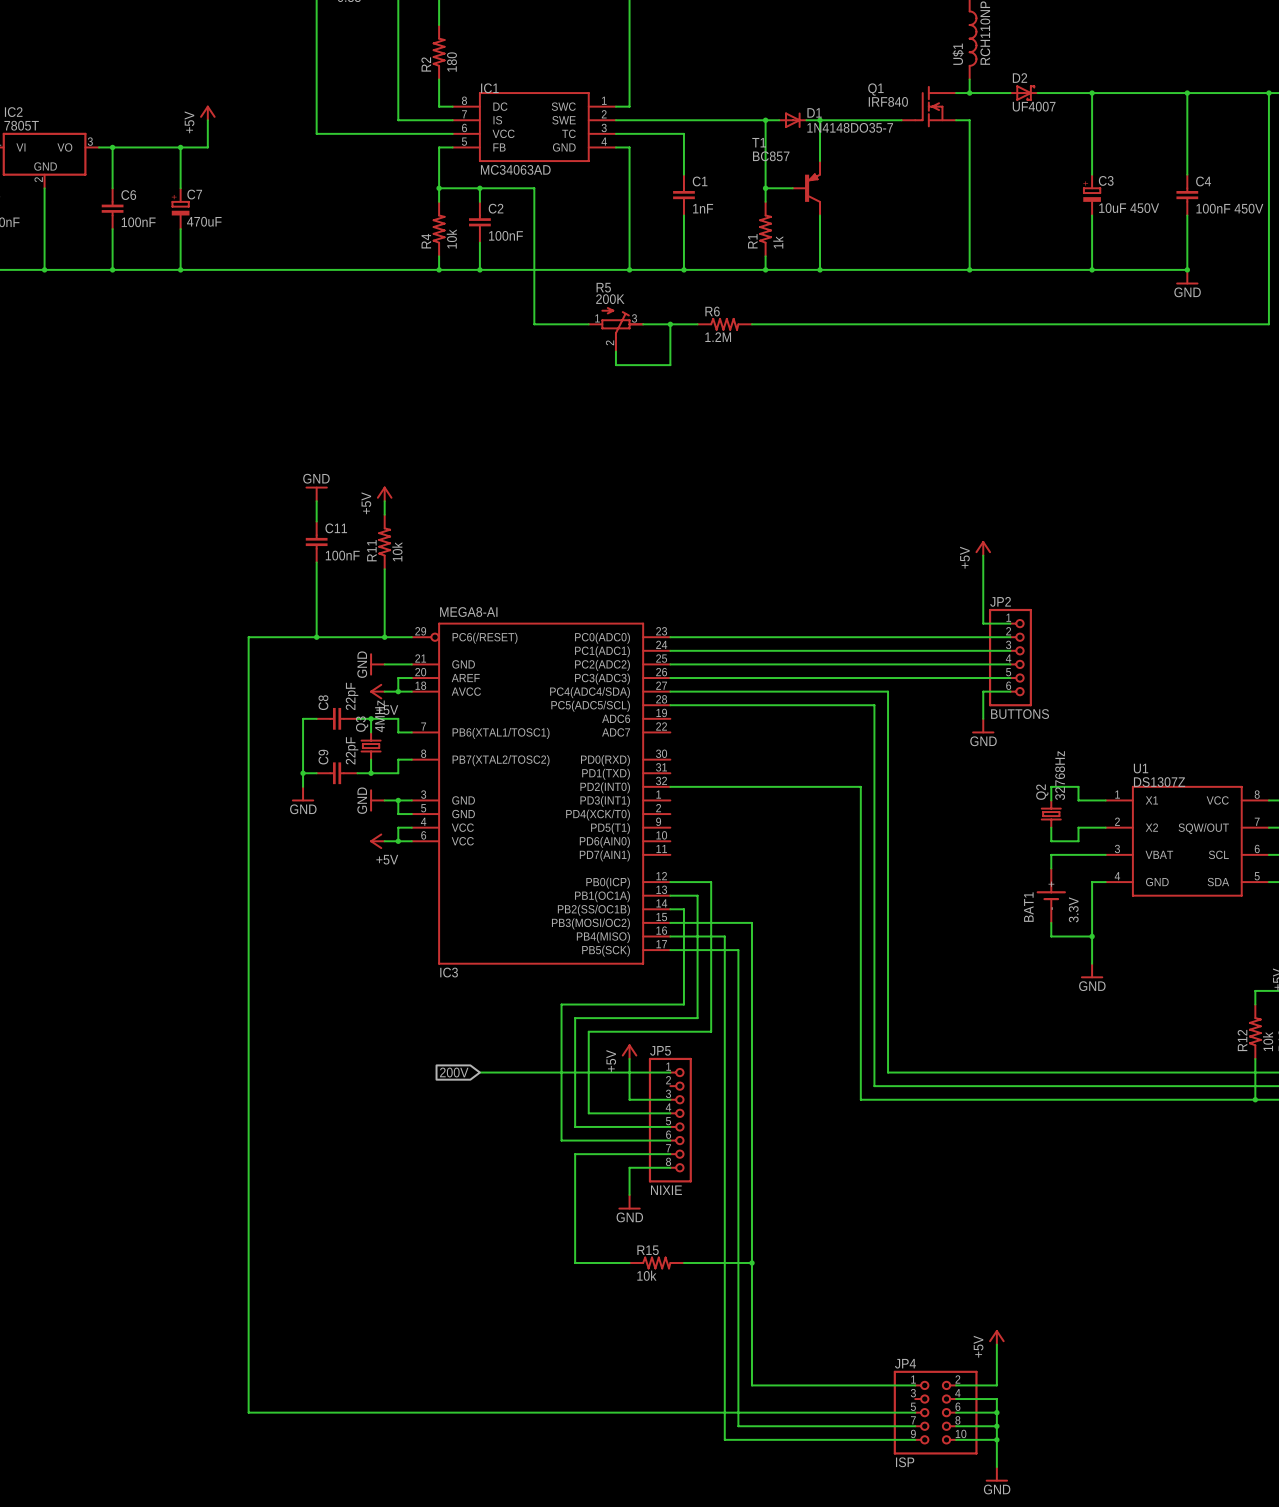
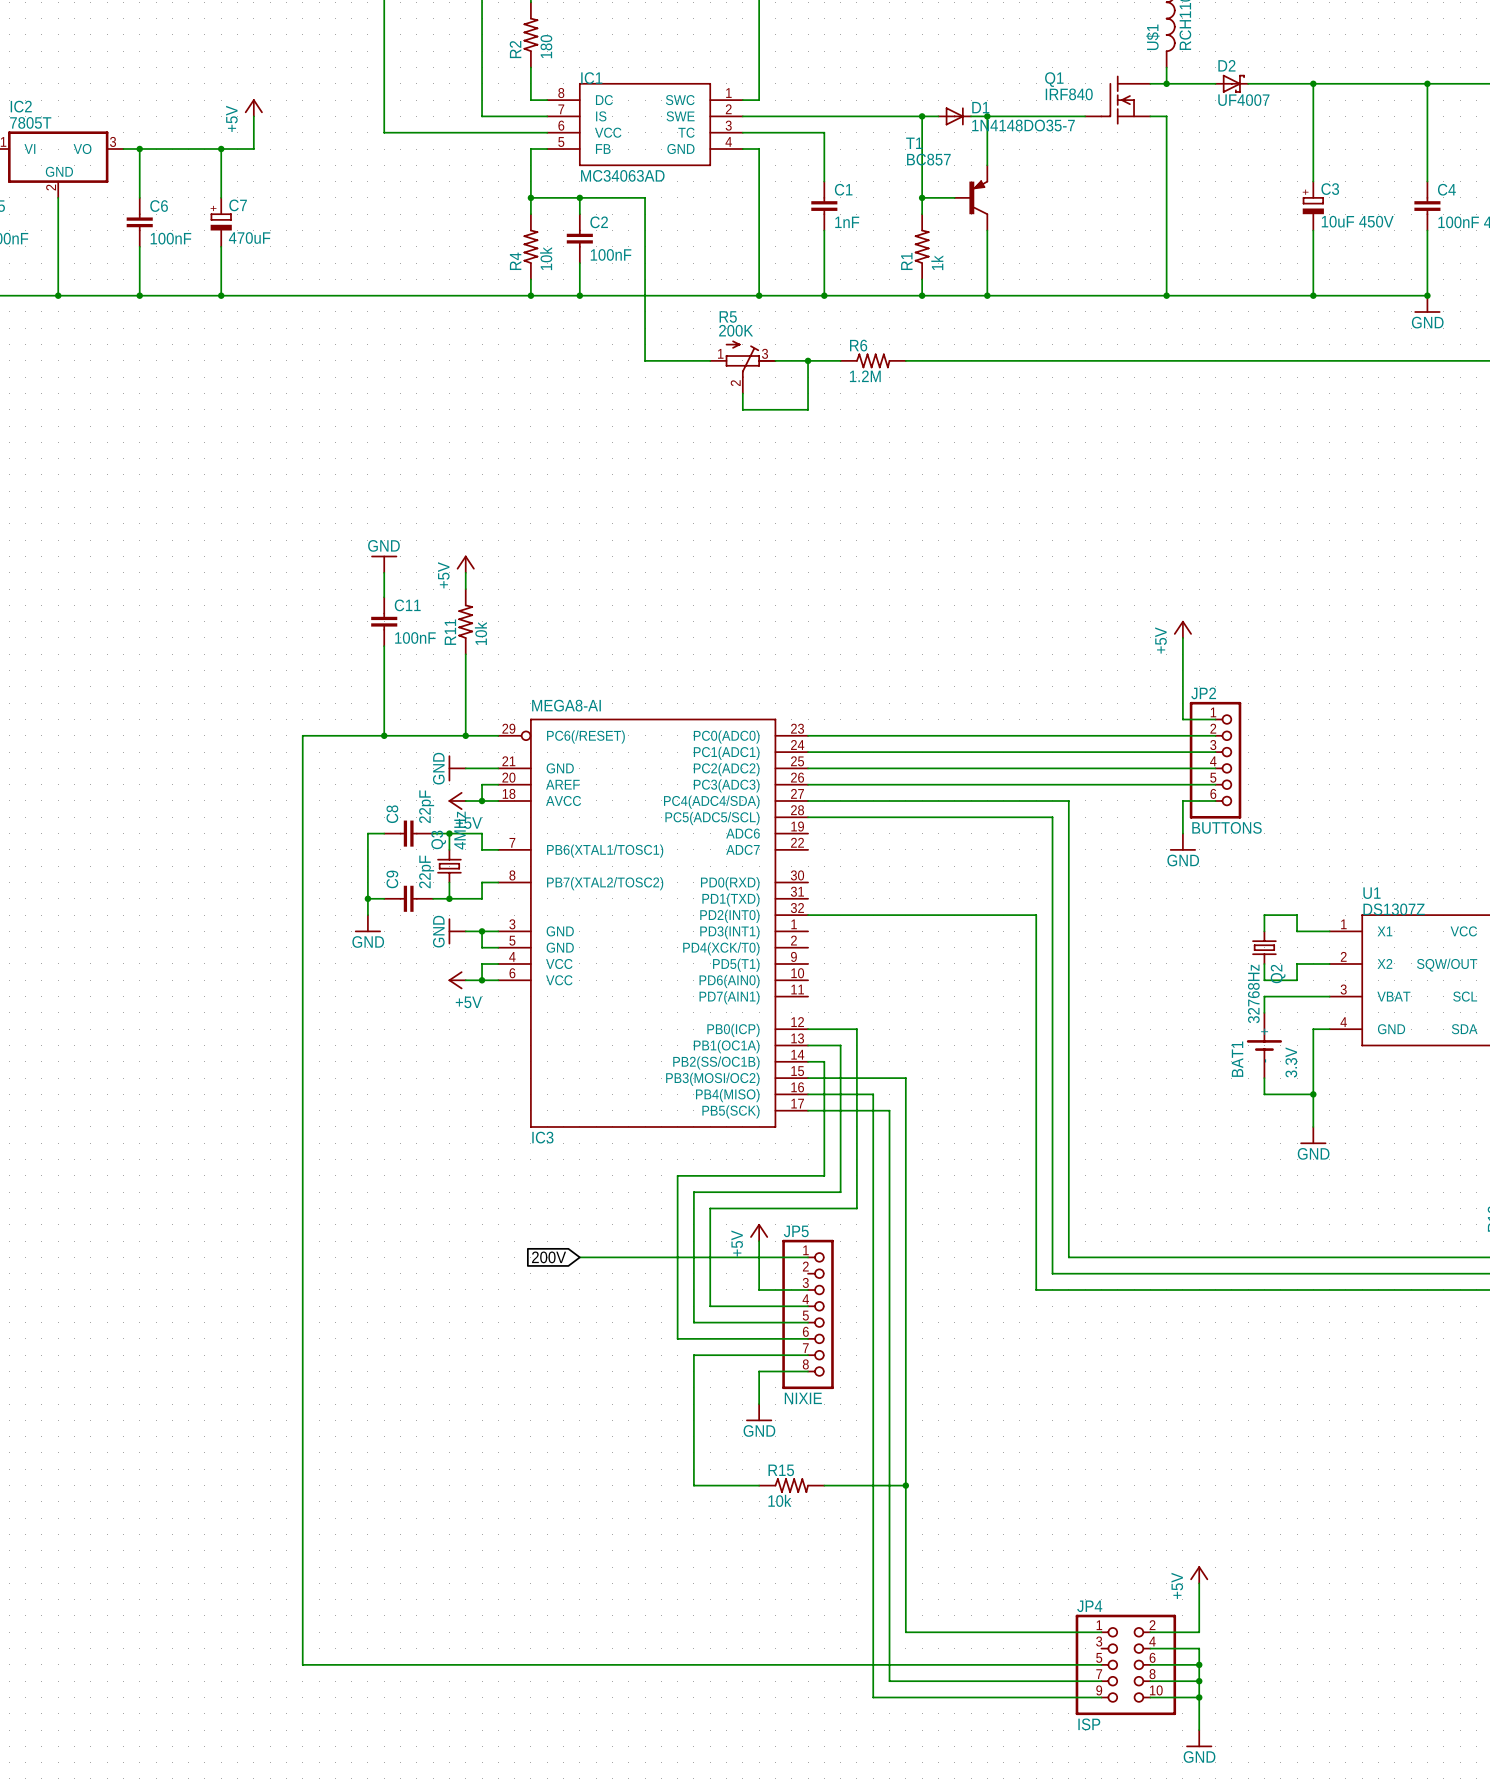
Q2 value position: 32768Hz (1060, 775) -> 32768Hz (1253, 993)
Q2 name position: Q2 (1042, 792) -> Q2 (1278, 973)

